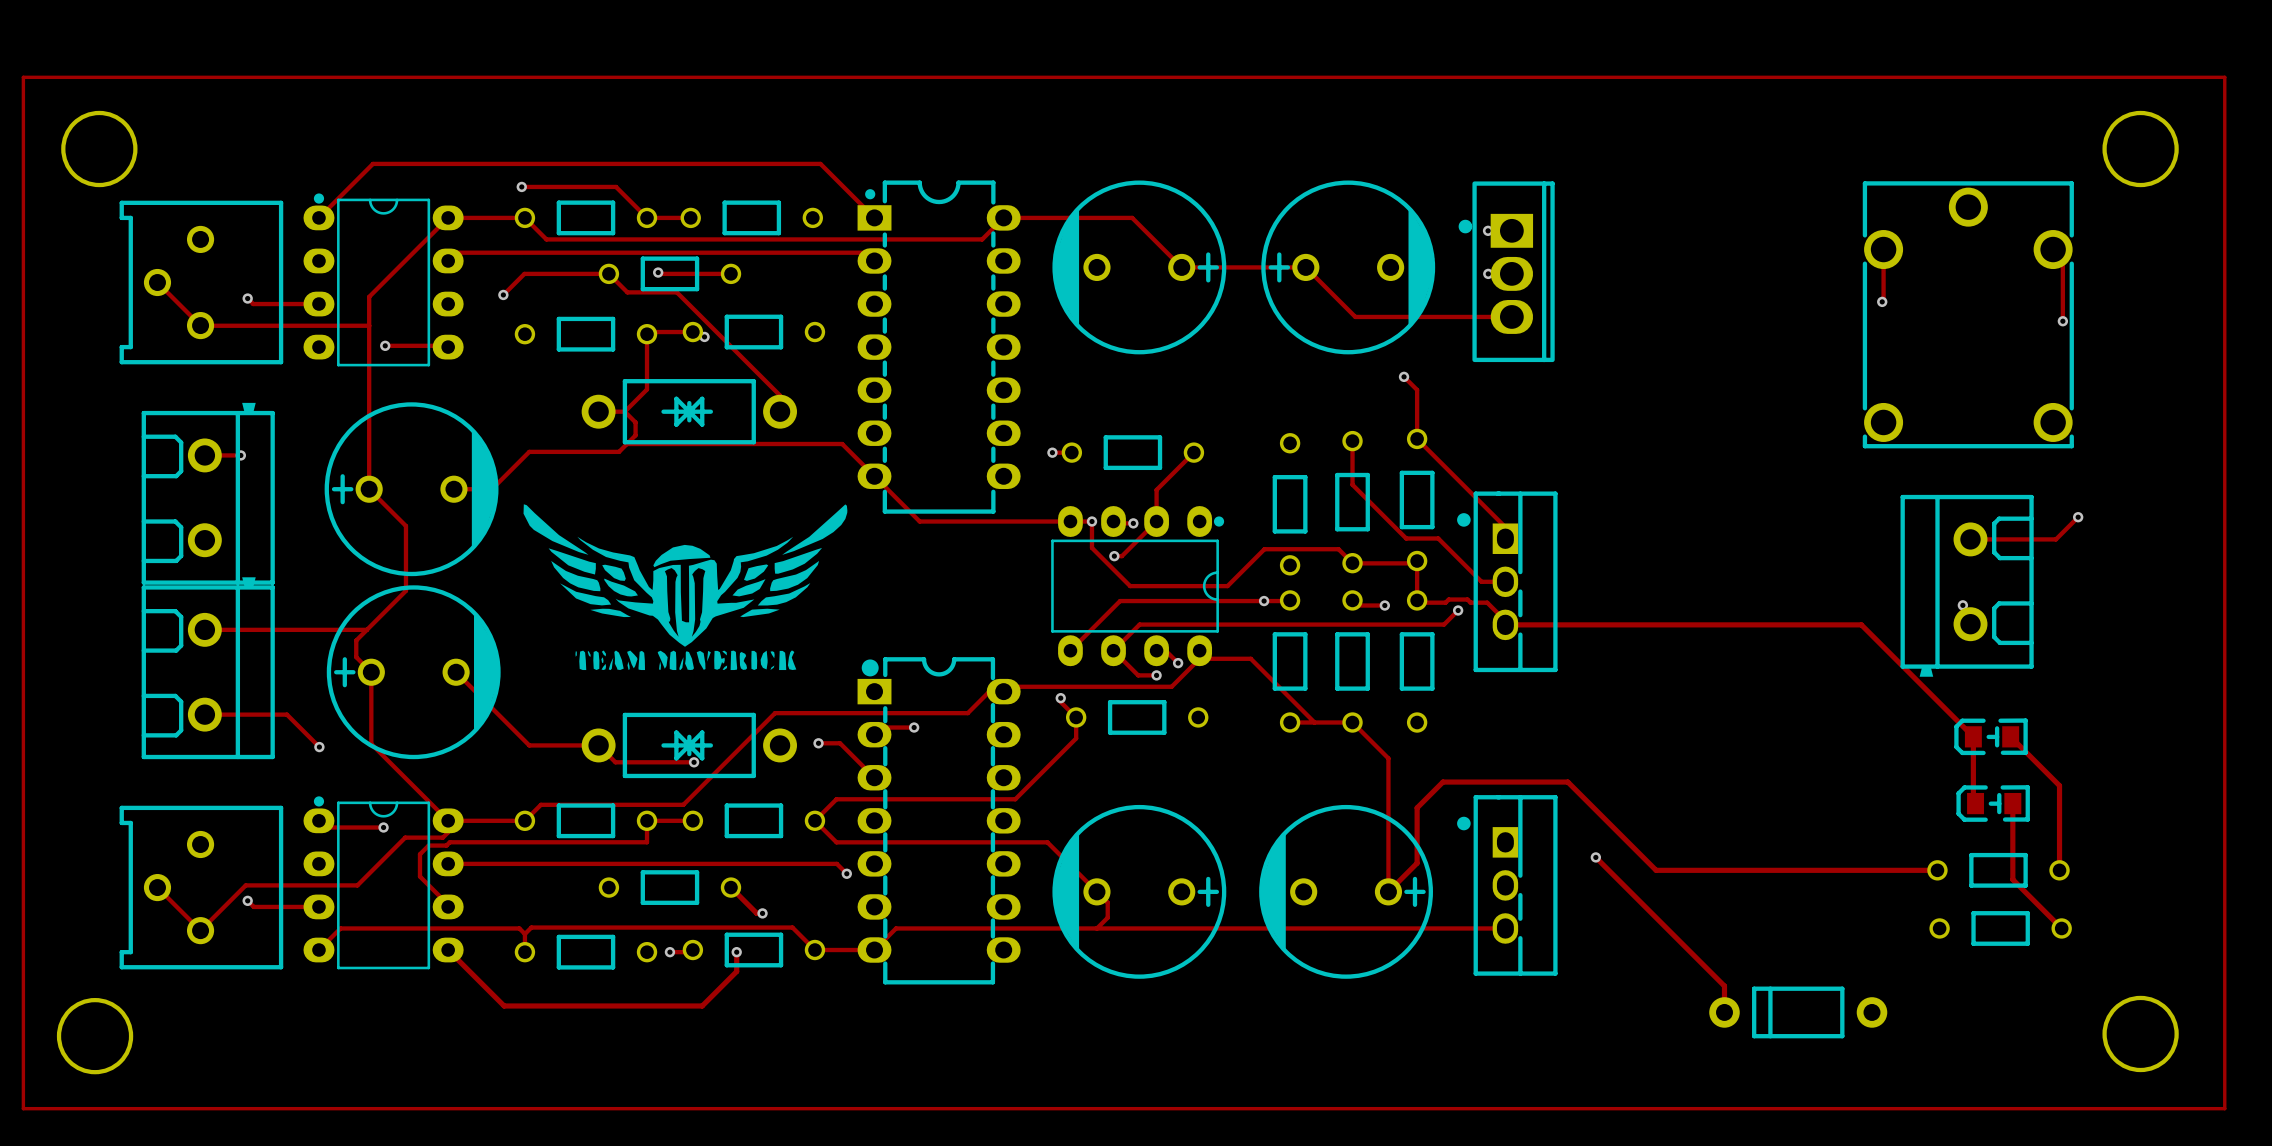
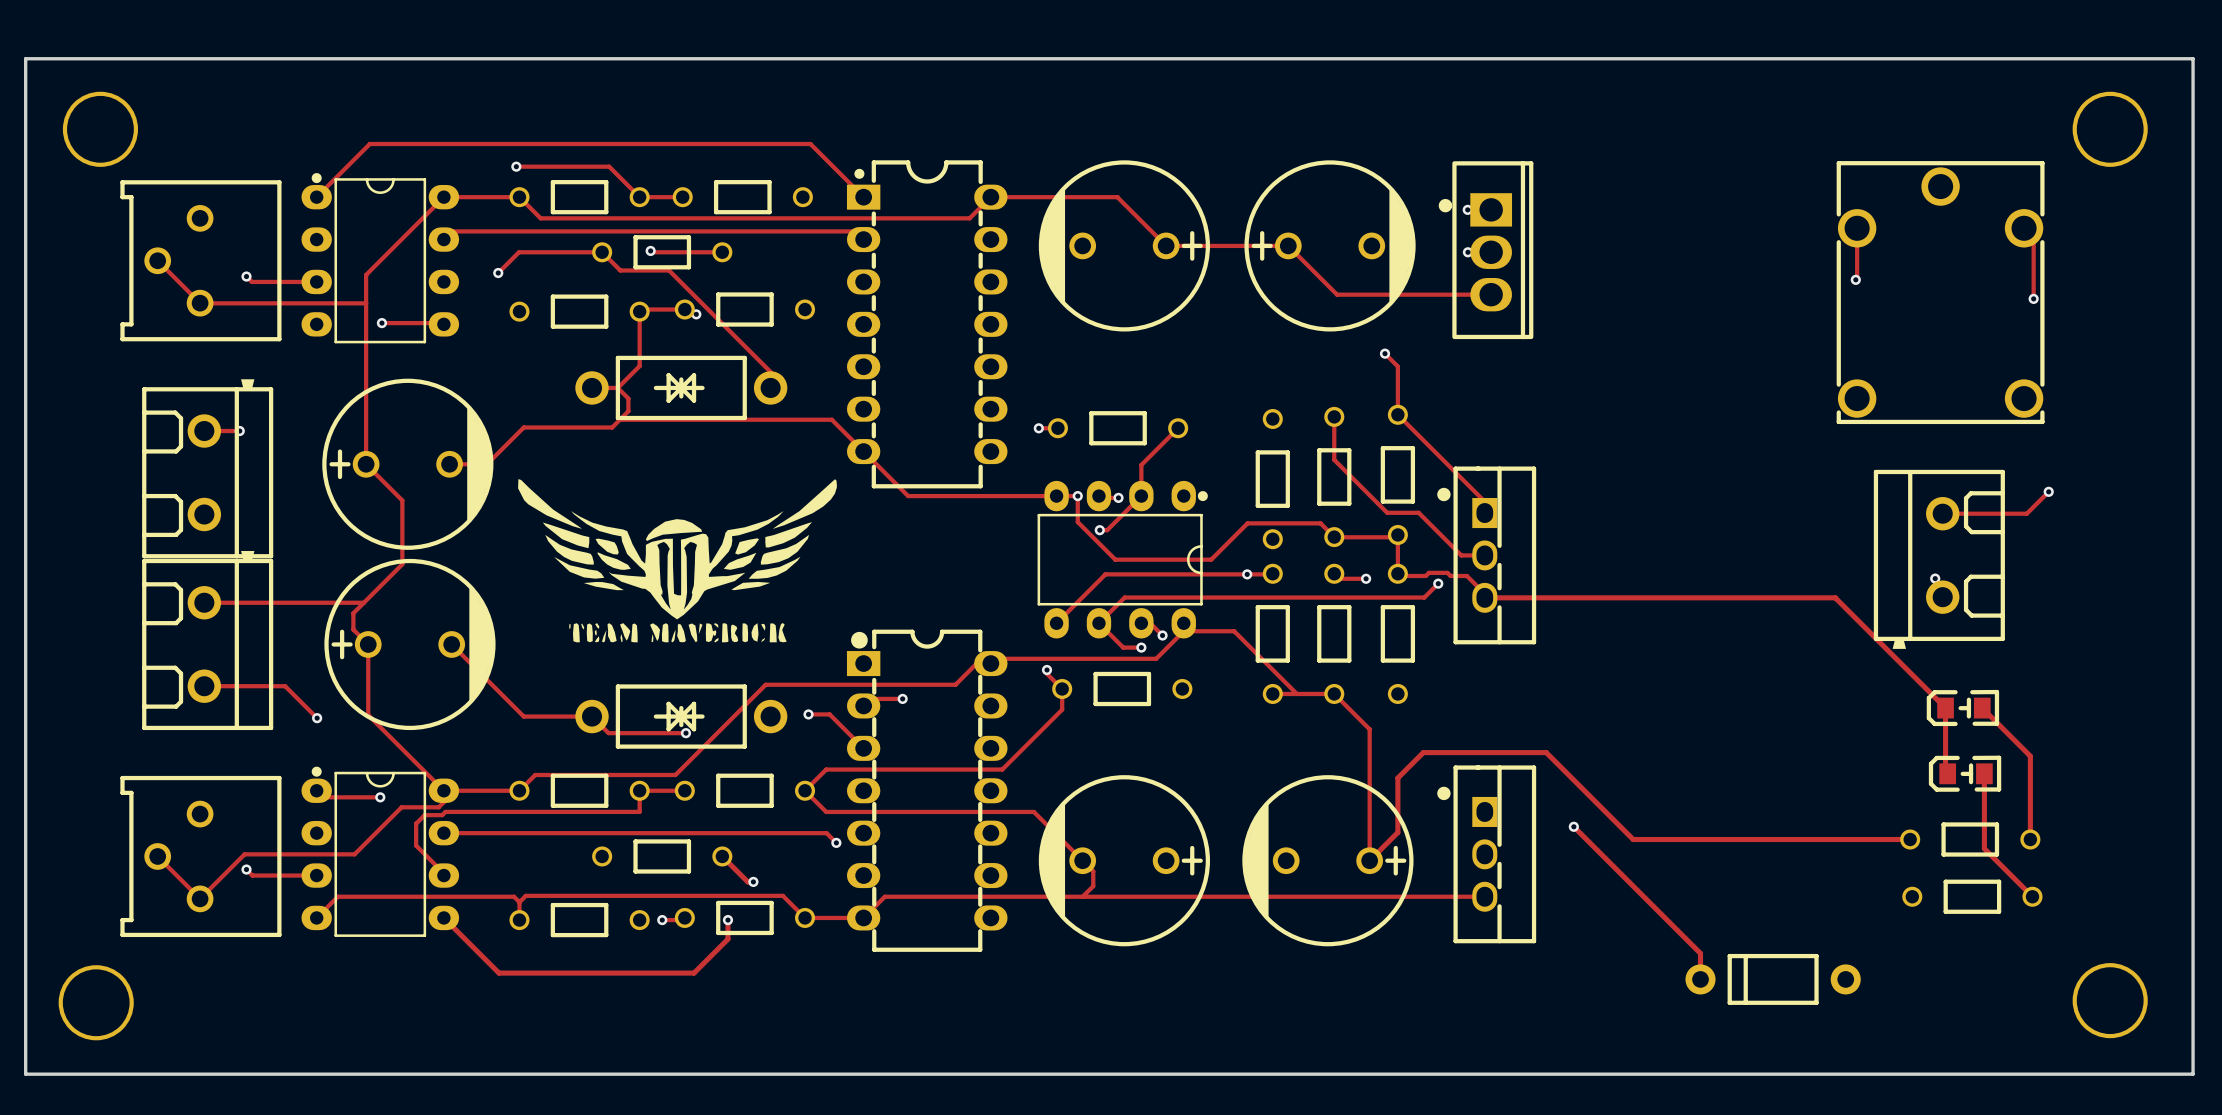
track: (23, 77) (2224, 77) (2224, 1108) (23, 1108) (23, 77) -> none
board edge: none -> (25, 58) (2193, 58) (2193, 1074) (25, 1074) (25, 58)

